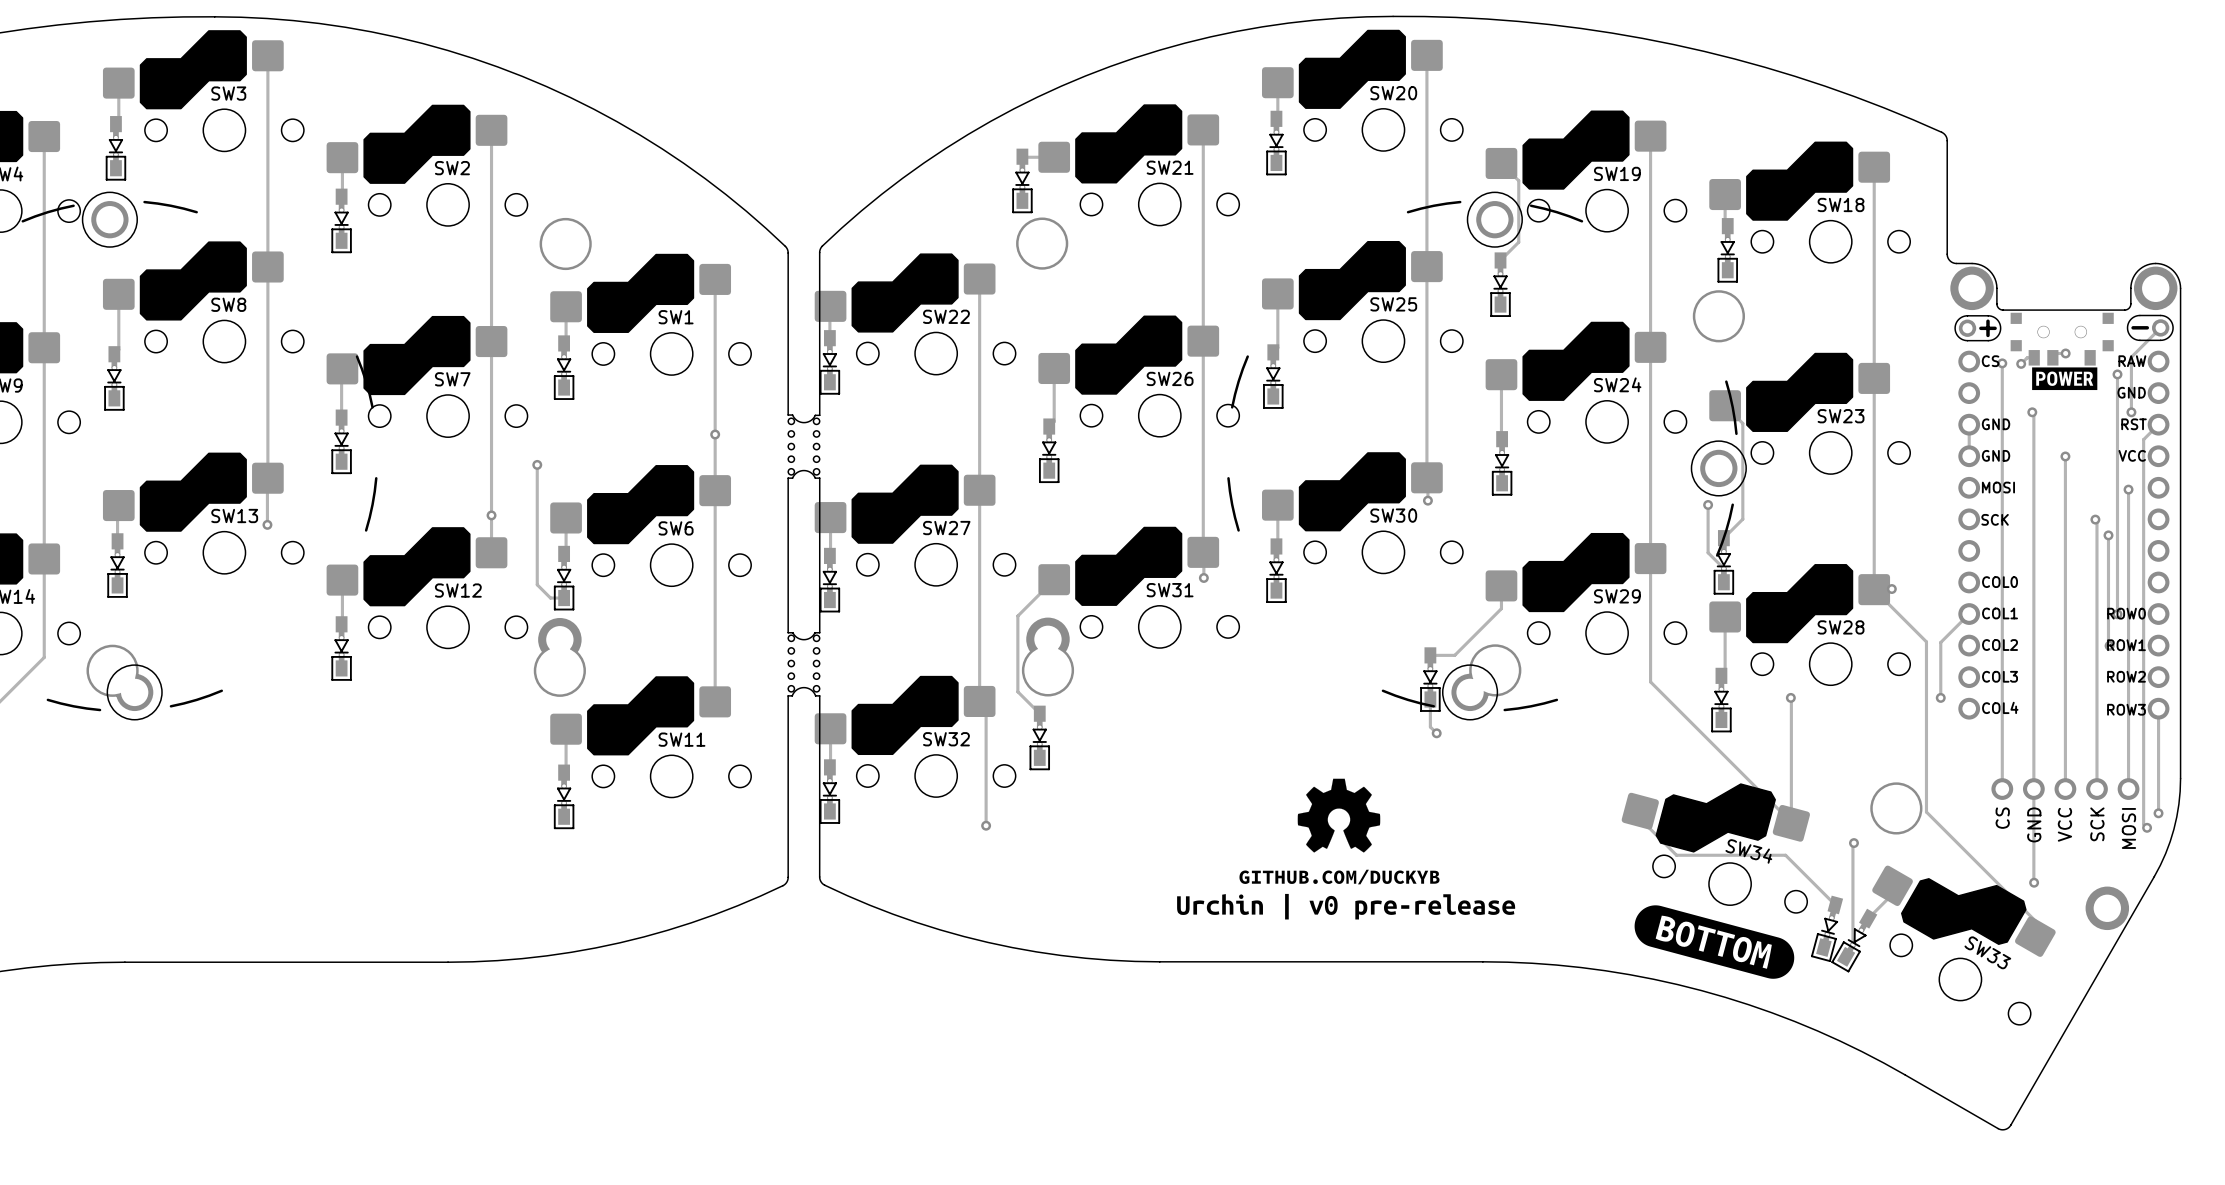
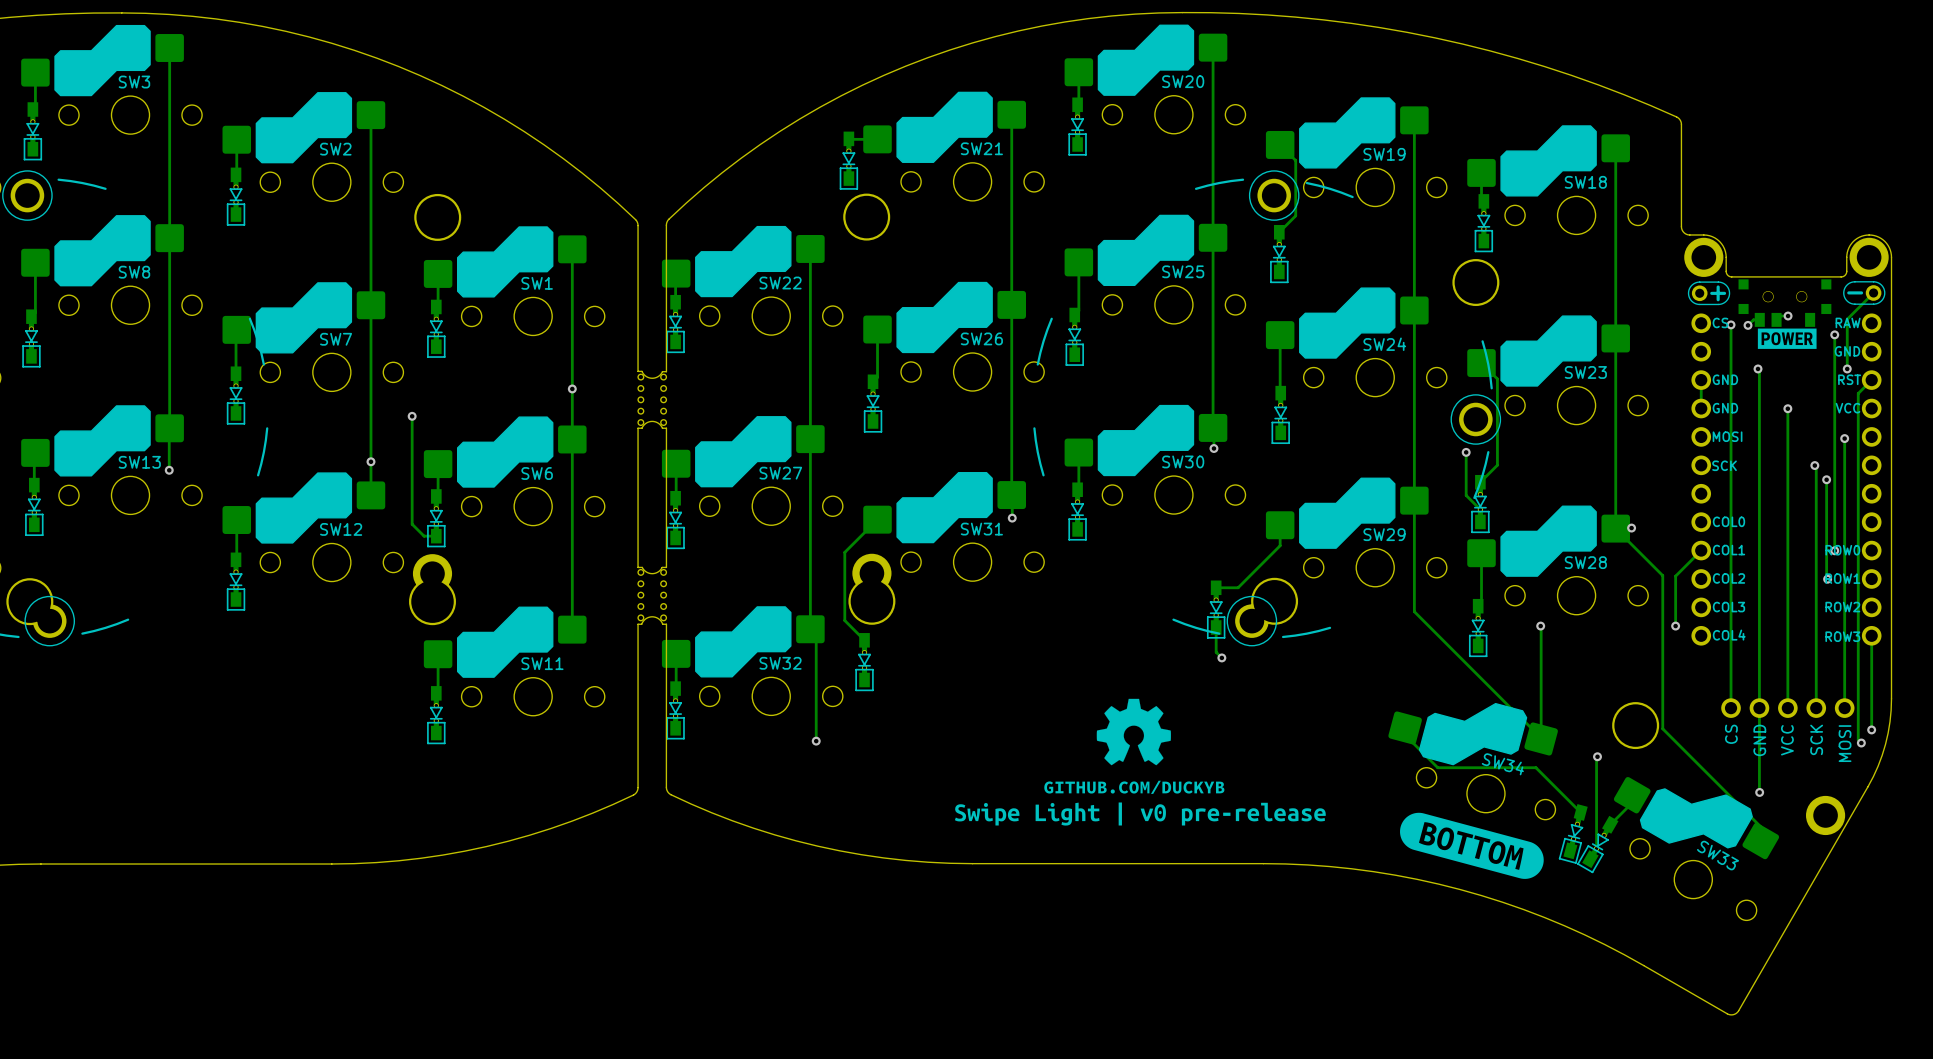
drawing shape: [1177, 893, 1516, 920] -> [954, 802, 1326, 826]

